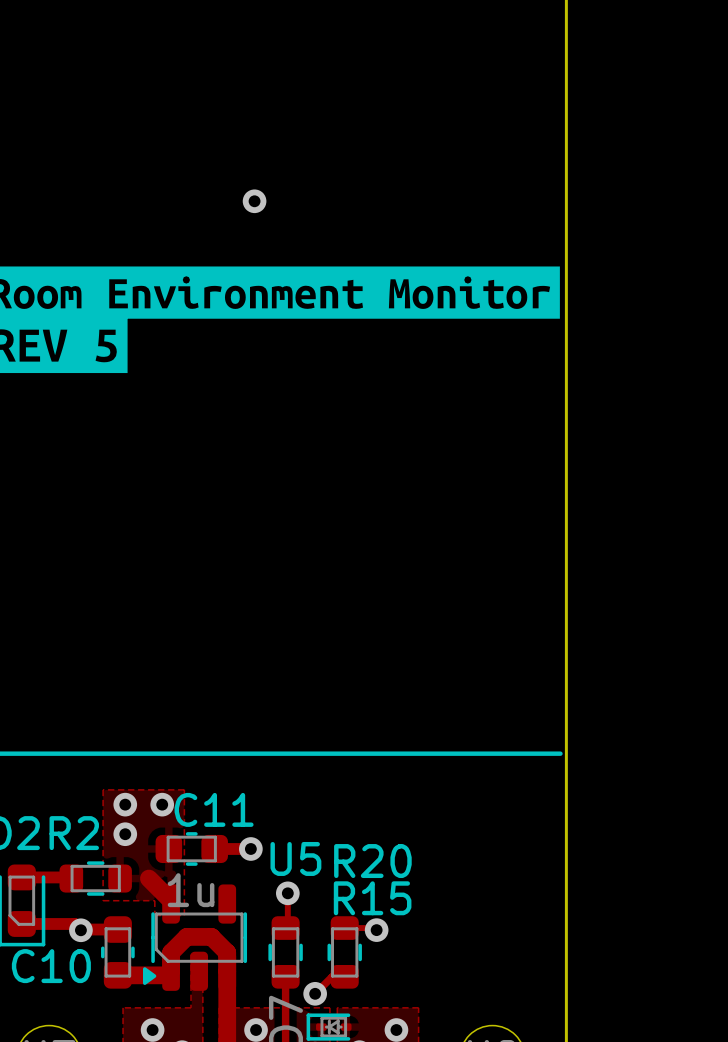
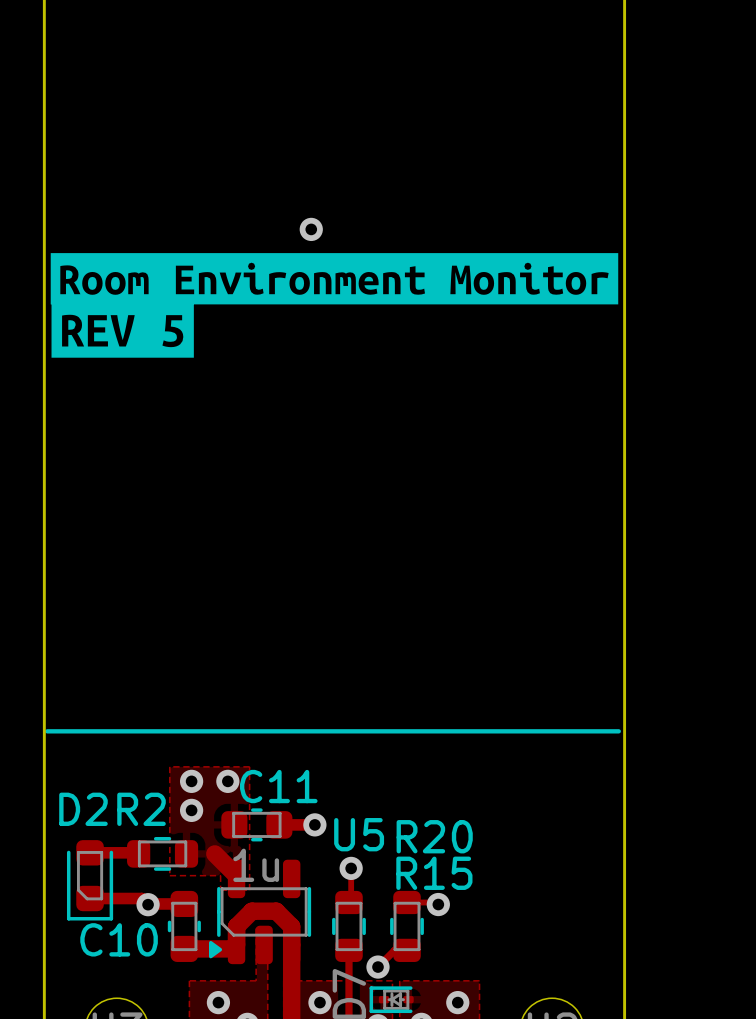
via position: (254, 201) -> (311, 229)

